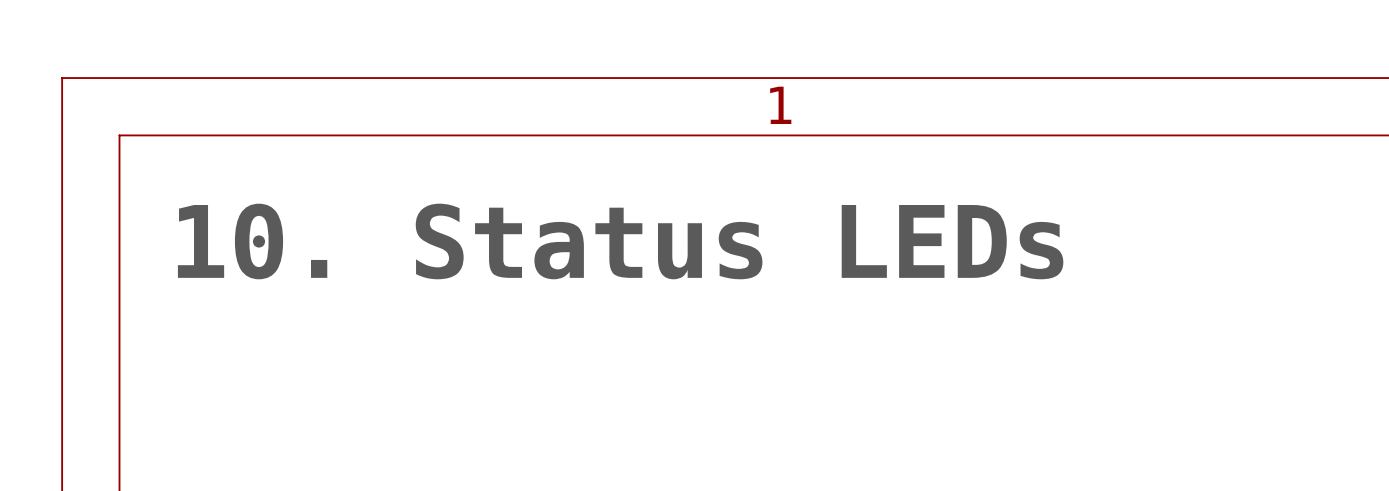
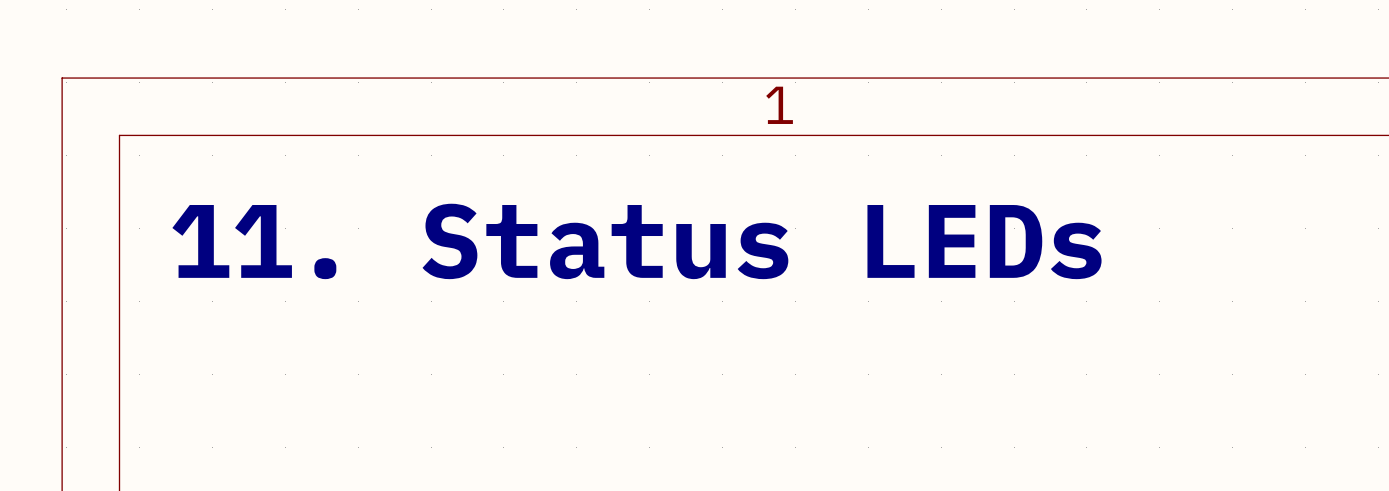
text: 10. Status LEDs (620, 241) -> 11. Status LEDs (636, 241)

